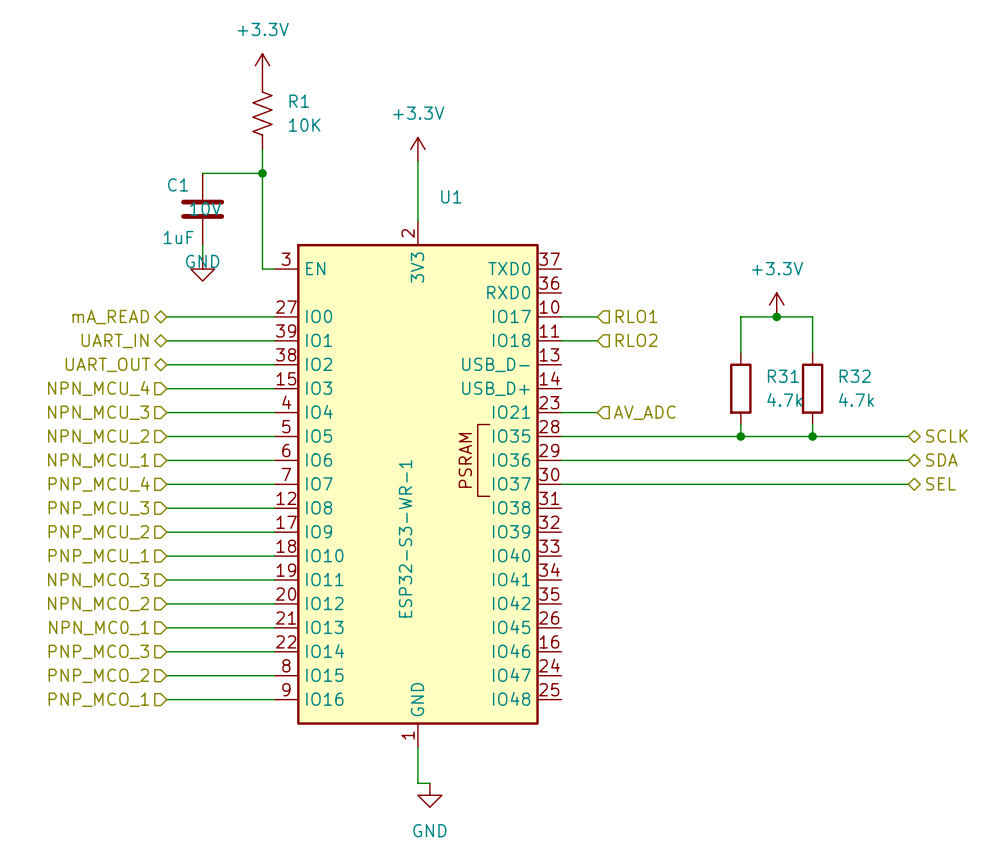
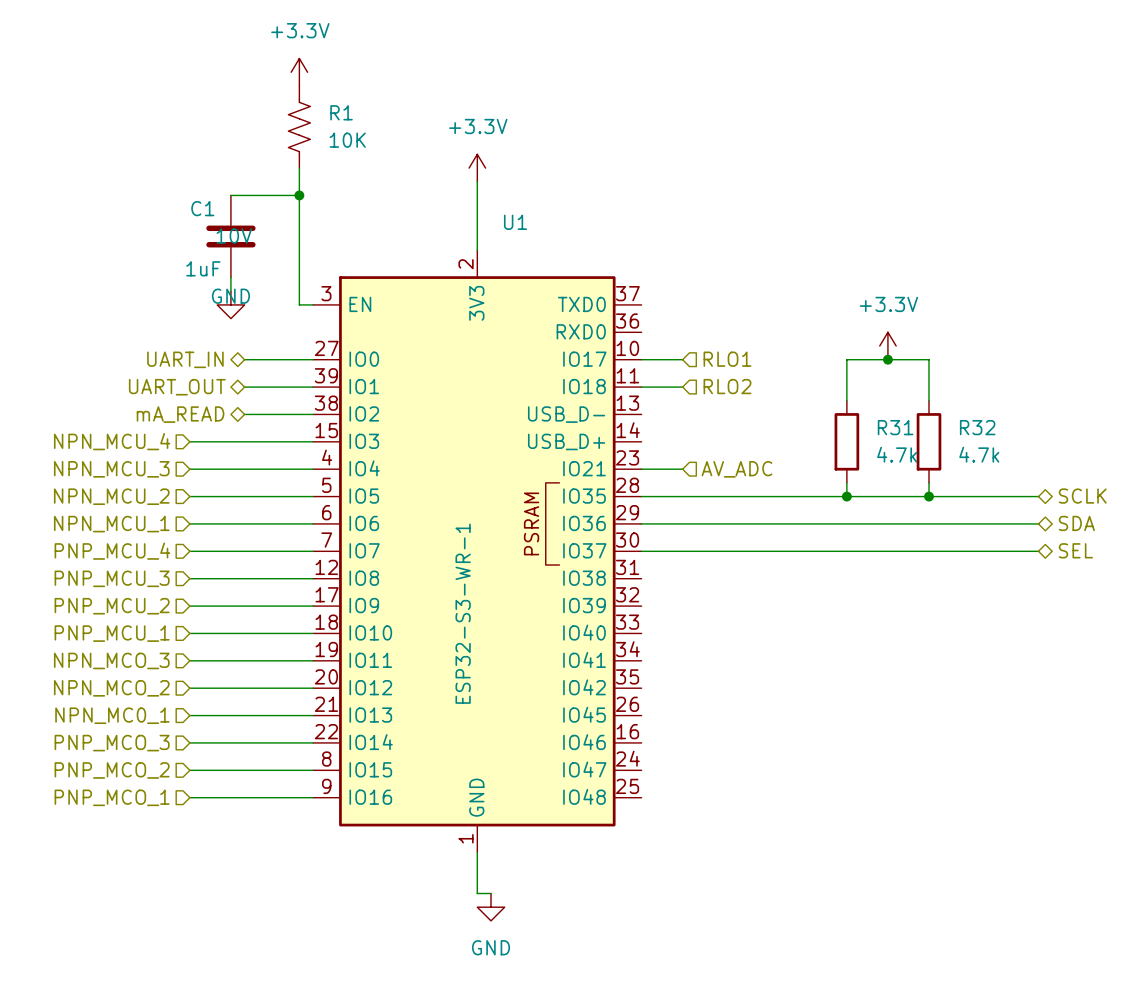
wire: (166, 316) (214, 316) -> none
hierarchical label position: mA_READ (110, 317) -> mA_READ (180, 414)
hierarchical label position: UART_IN (115, 340) -> UART_IN (185, 359)
wire: (166, 340) (214, 340) -> none
hierarchical label position: UART_OUT (107, 364) -> UART_OUT (177, 387)
wire: (166, 364) (214, 364) -> none

